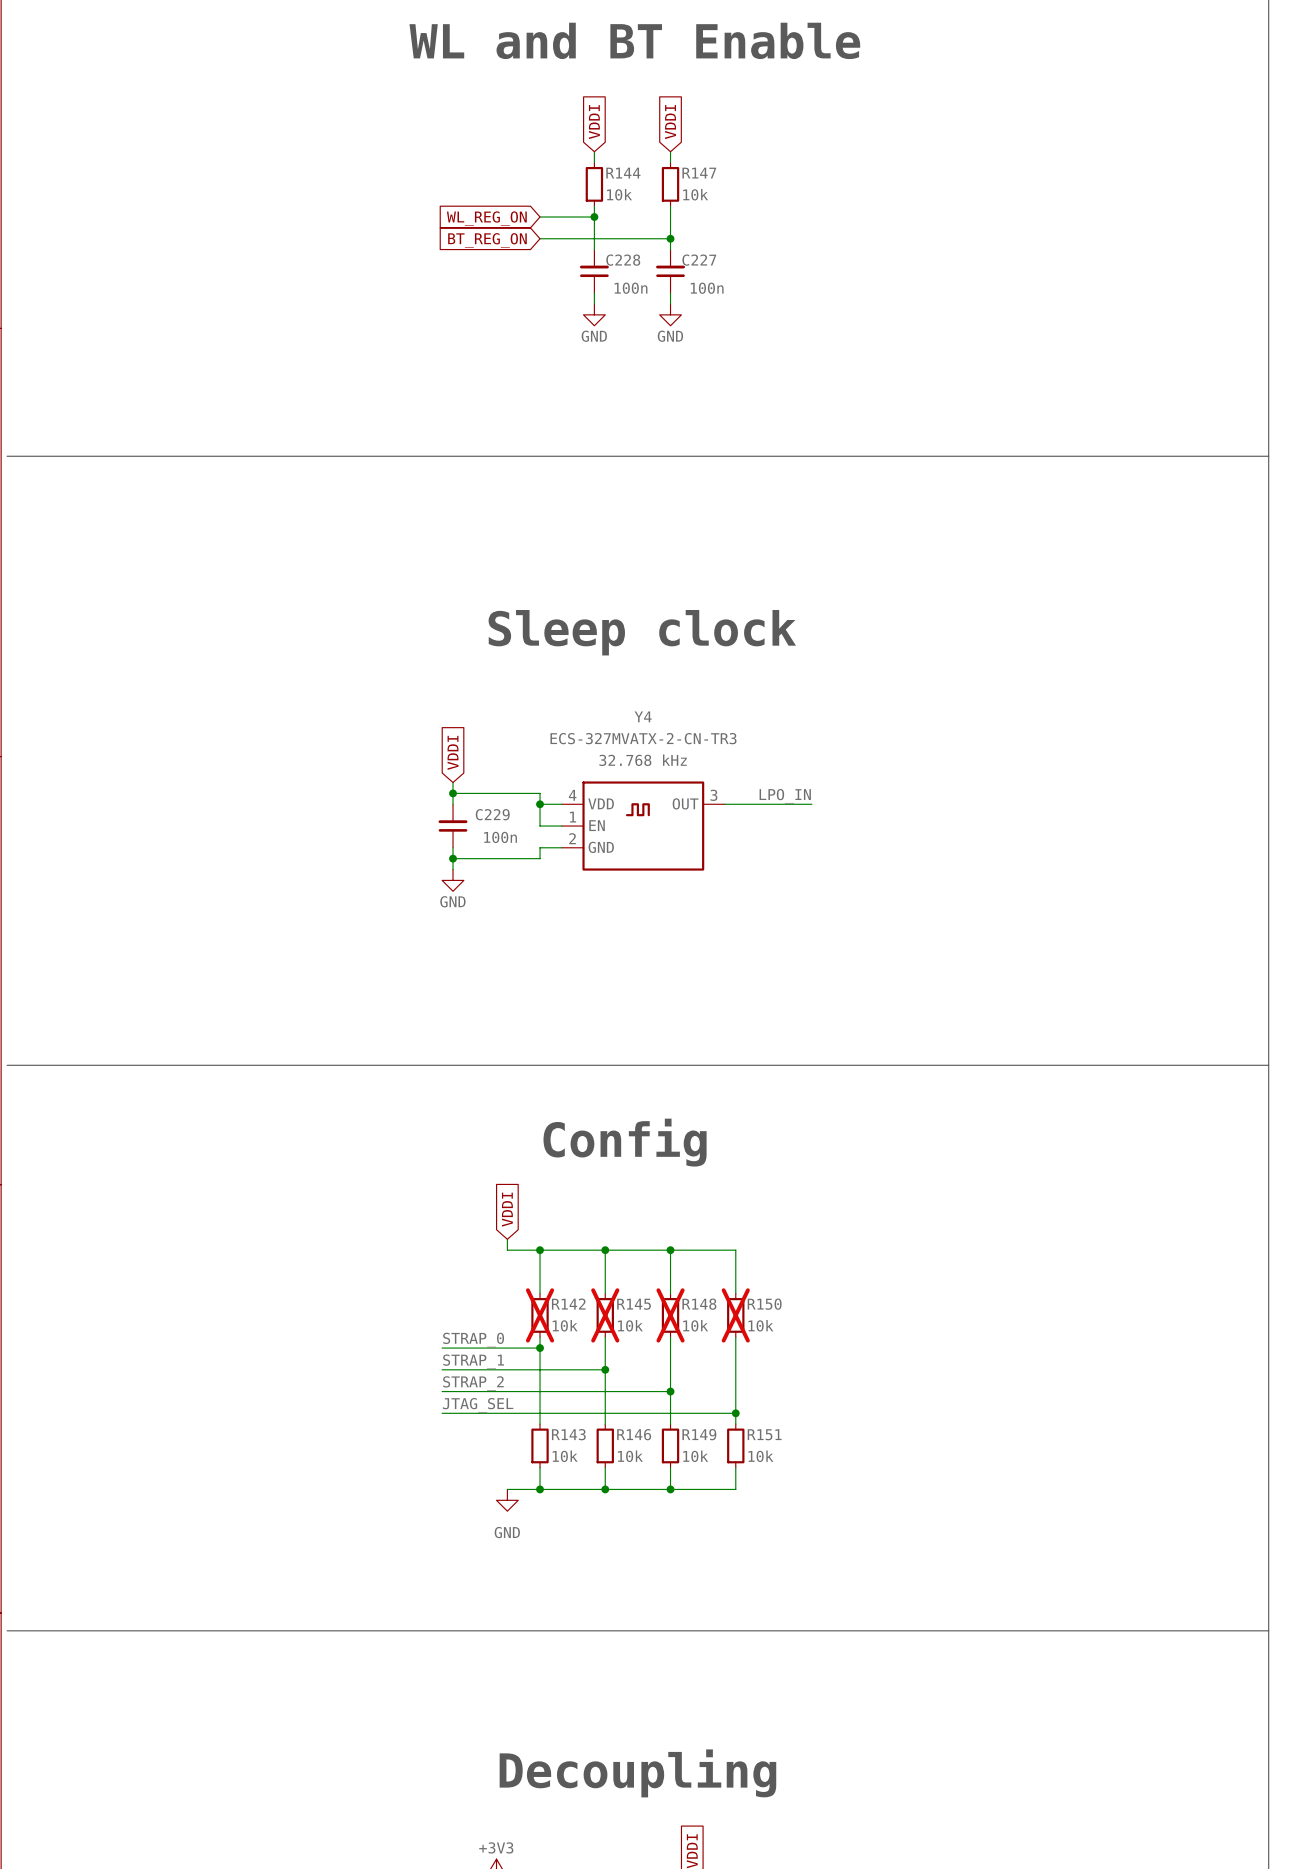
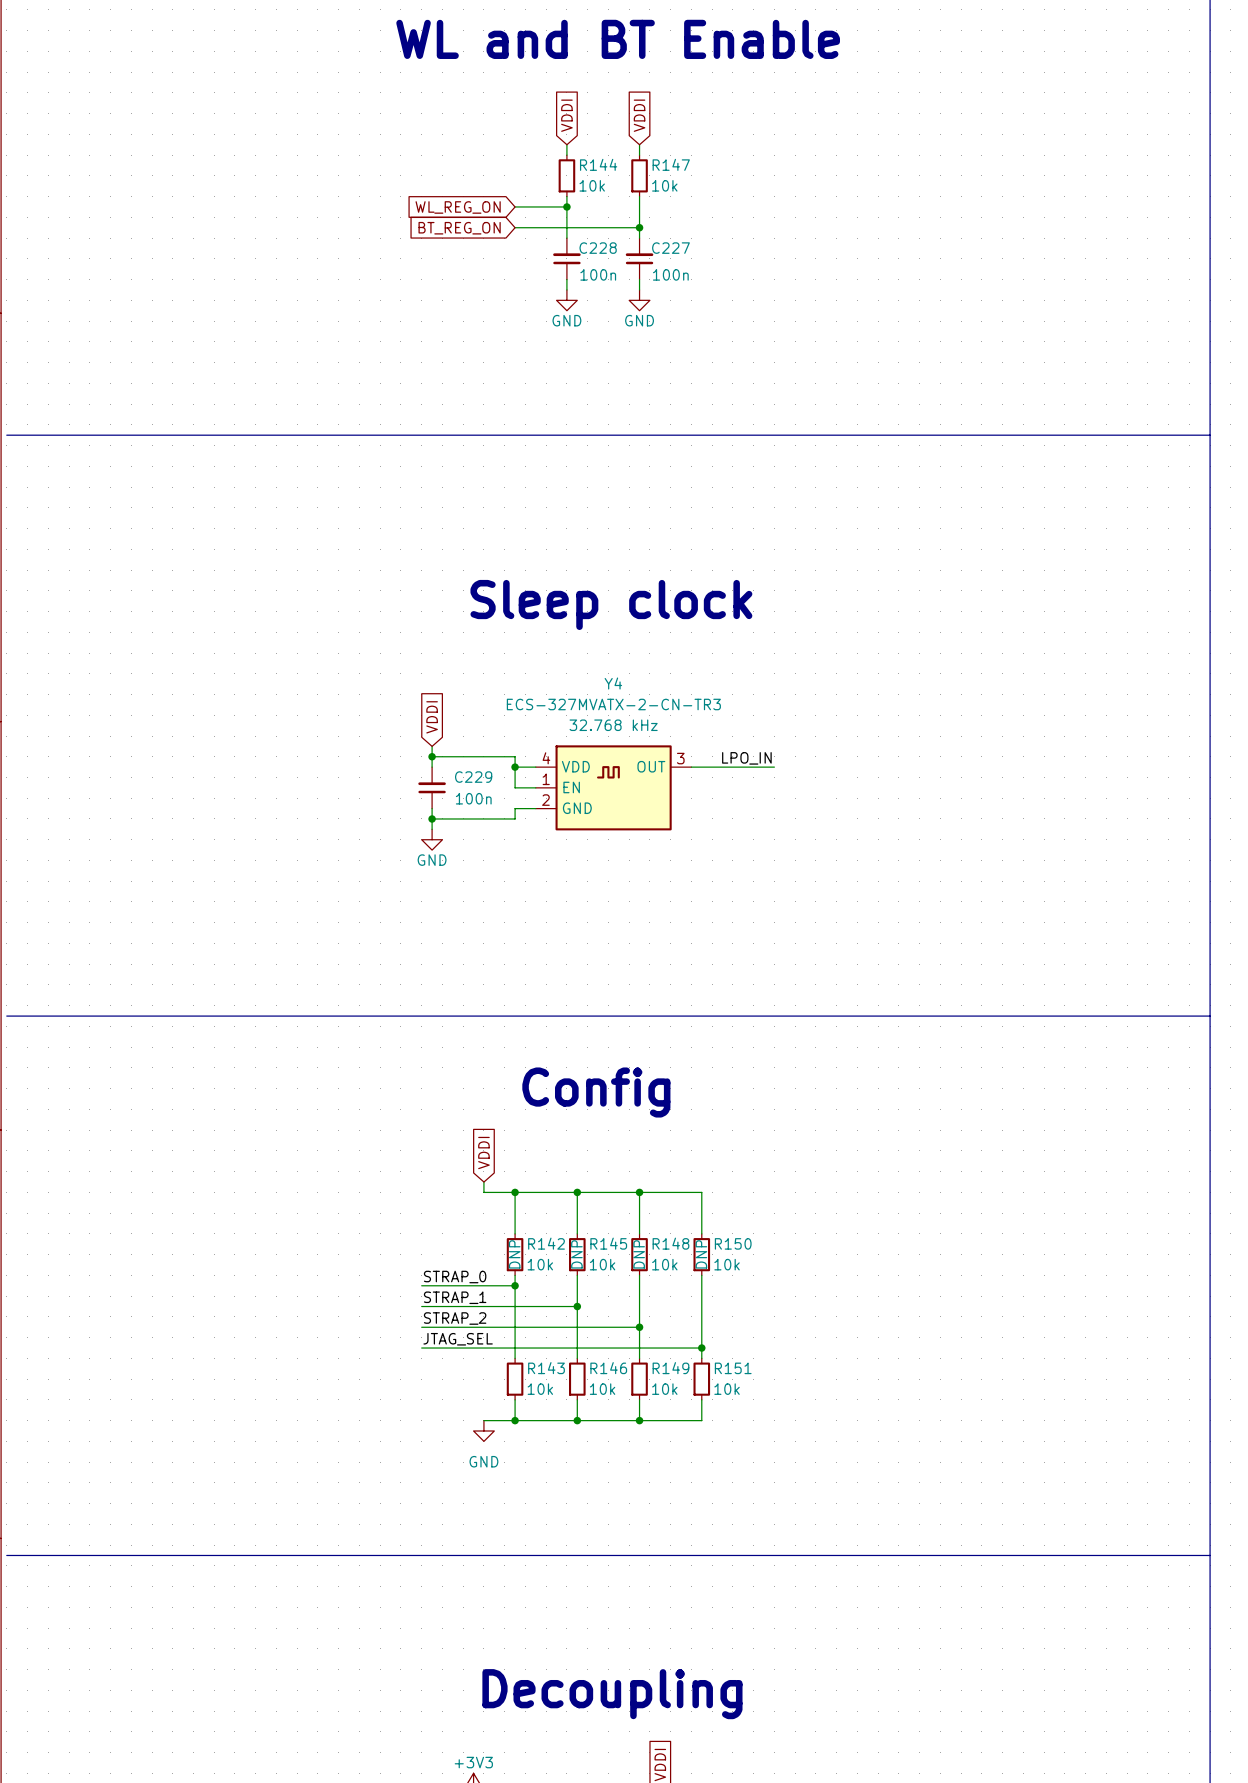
R142 text: none -> DNP (514, 1254)
R142 do-not-place cross: (540, 1315) -> none
R145 text: none -> DNP (576, 1254)
R145 do-not-place cross: (605, 1315) -> none
R148 do-not-place cross: (670, 1315) -> none
R148 text: none -> DNP (639, 1254)
R150 do-not-place cross: (735, 1315) -> none
R150 text: none -> DNP (701, 1254)

